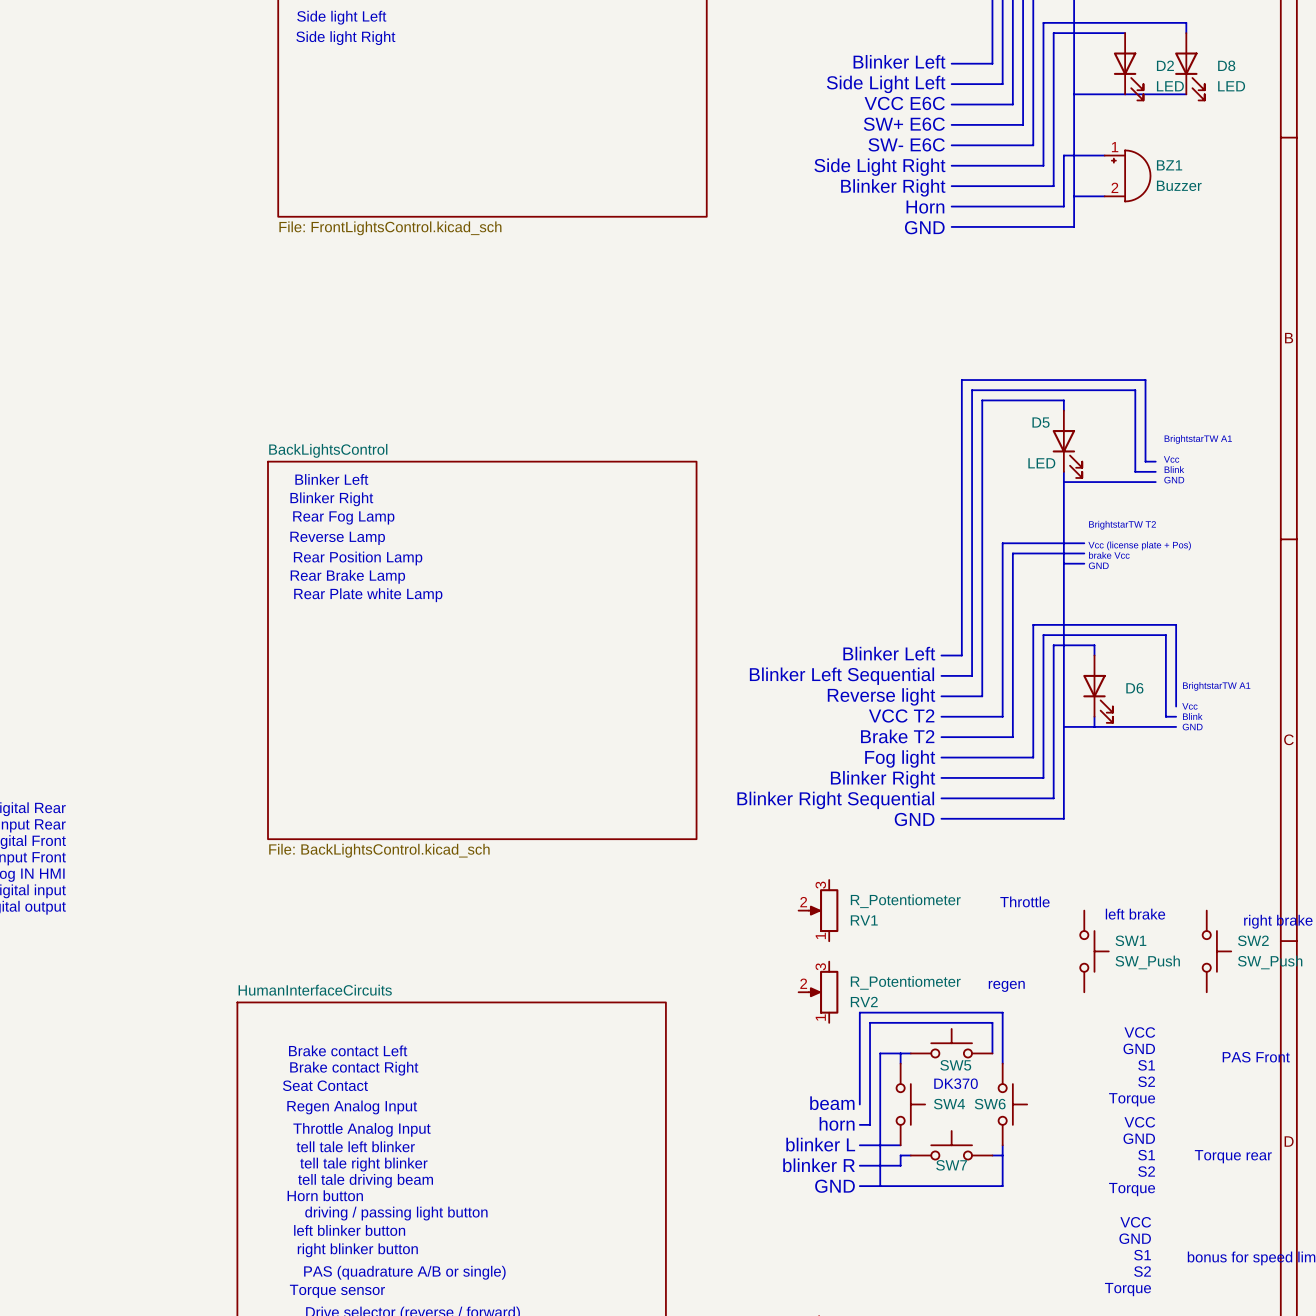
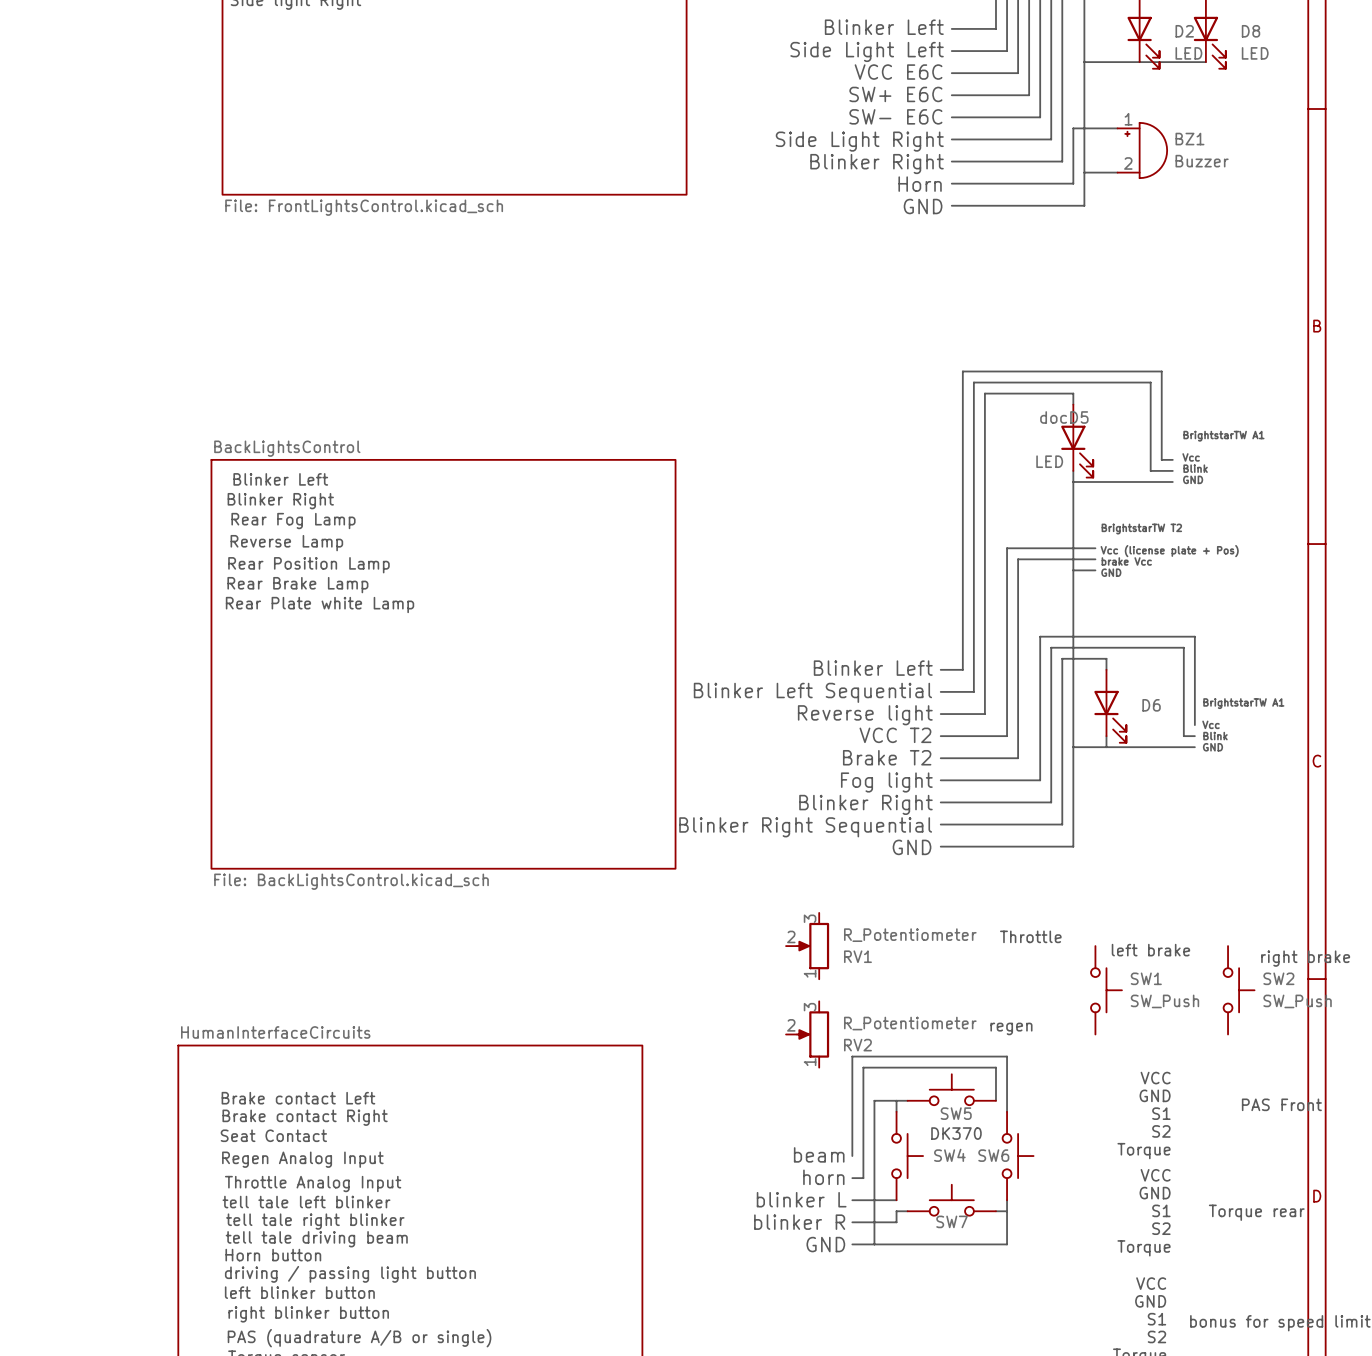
D5 name: D5 (1041, 422) -> docD5 (1064, 417)

